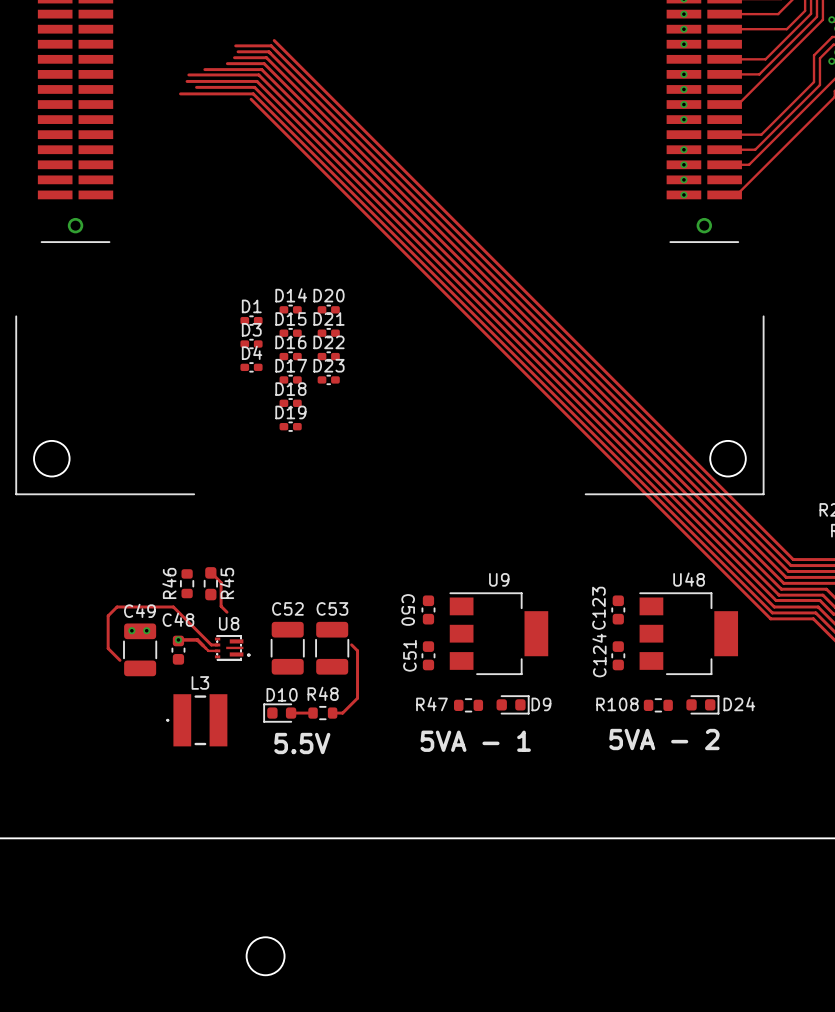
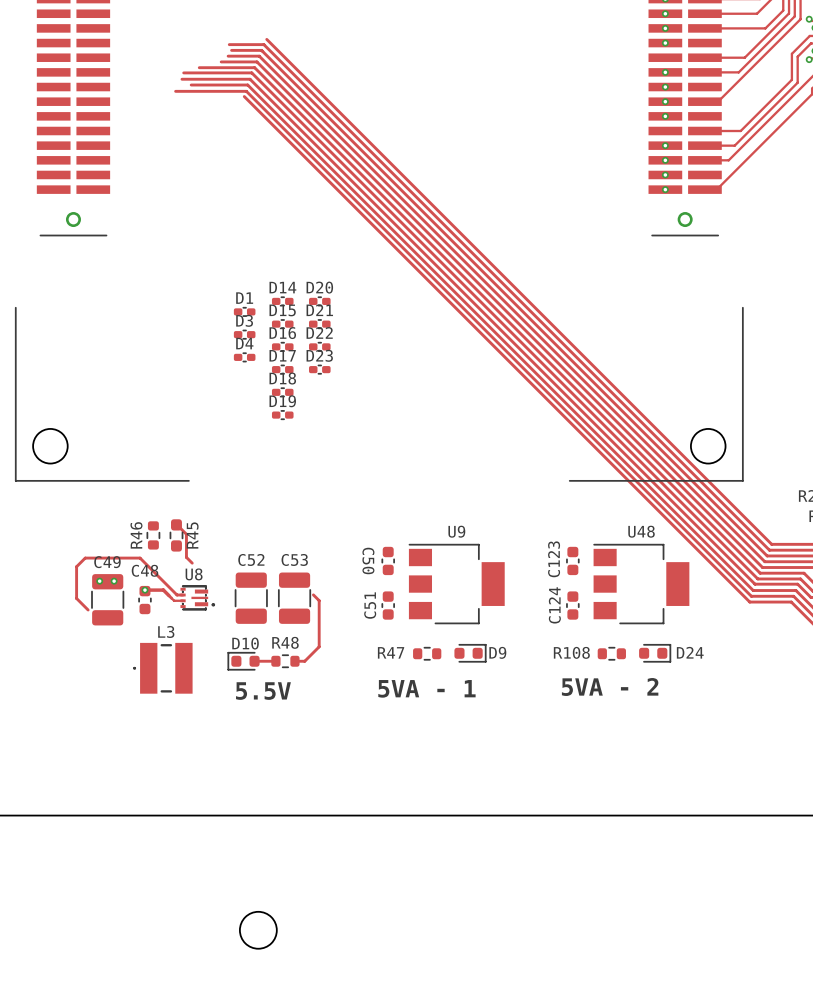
track: (210, 572) (221, 582) (221, 606) (227, 612) -> (176, 524) (186, 534) (186, 557) (192, 563)
R46 position: (187, 583) -> (153, 535)
R45 position: (210, 583) -> (176, 535)
via: none -> (99, 581)
via: none -> (114, 581)
via: none -> (144, 590)
C50 position: (428, 609) -> (388, 560)
C123 position: (618, 609) -> (572, 560)
via: (131, 630) -> none
via: (146, 630) -> none
U9 position: (498, 633) -> (456, 584)
U48 position: (688, 633) -> (641, 584)
track: (178, 639) (197, 639) (208, 650) (217, 650) -> (144, 590) (163, 590) (174, 600) (183, 600)
via: (178, 639) -> none
track: (217, 644) (211, 644) (173, 607) (117, 607) (108, 615) (108, 648) (120, 660) -> (183, 595) (177, 595) (140, 558) (85, 558) (76, 566) (76, 598) (88, 610)
track: (351, 644) (357, 650) (357, 698) (342, 713) (332, 713) -> (313, 594) (319, 600) (319, 646) (304, 661) (294, 661)
U8 position: (232, 647) -> (197, 597)
C52 position: (287, 648) -> (251, 598)
C53 position: (332, 648) -> (294, 598)
C49 position: (140, 649) -> (107, 599)
C48 position: (178, 650) -> (144, 600)
C51 position: (428, 655) -> (388, 605)
C124 position: (618, 655) -> (572, 605)
D9 position: (512, 704) -> (470, 653)
D24 position: (702, 704) -> (655, 653)
R47 position: (468, 705) -> (427, 653)
R108 position: (658, 705) -> (611, 653)
D10 position: (279, 713) -> (243, 661)
track: (291, 713) (313, 713) -> (254, 661) (275, 661)
R48 position: (322, 713) -> (285, 661)
L3 position: (196, 720) -> (163, 668)
text position: 5VA - 2 (664, 739) -> 5VA - 2 (610, 687)
text position: 5VA - 1 (475, 741) -> 5VA - 1 (426, 688)
text position: 5.5V (302, 743) -> 5.5V (263, 691)

